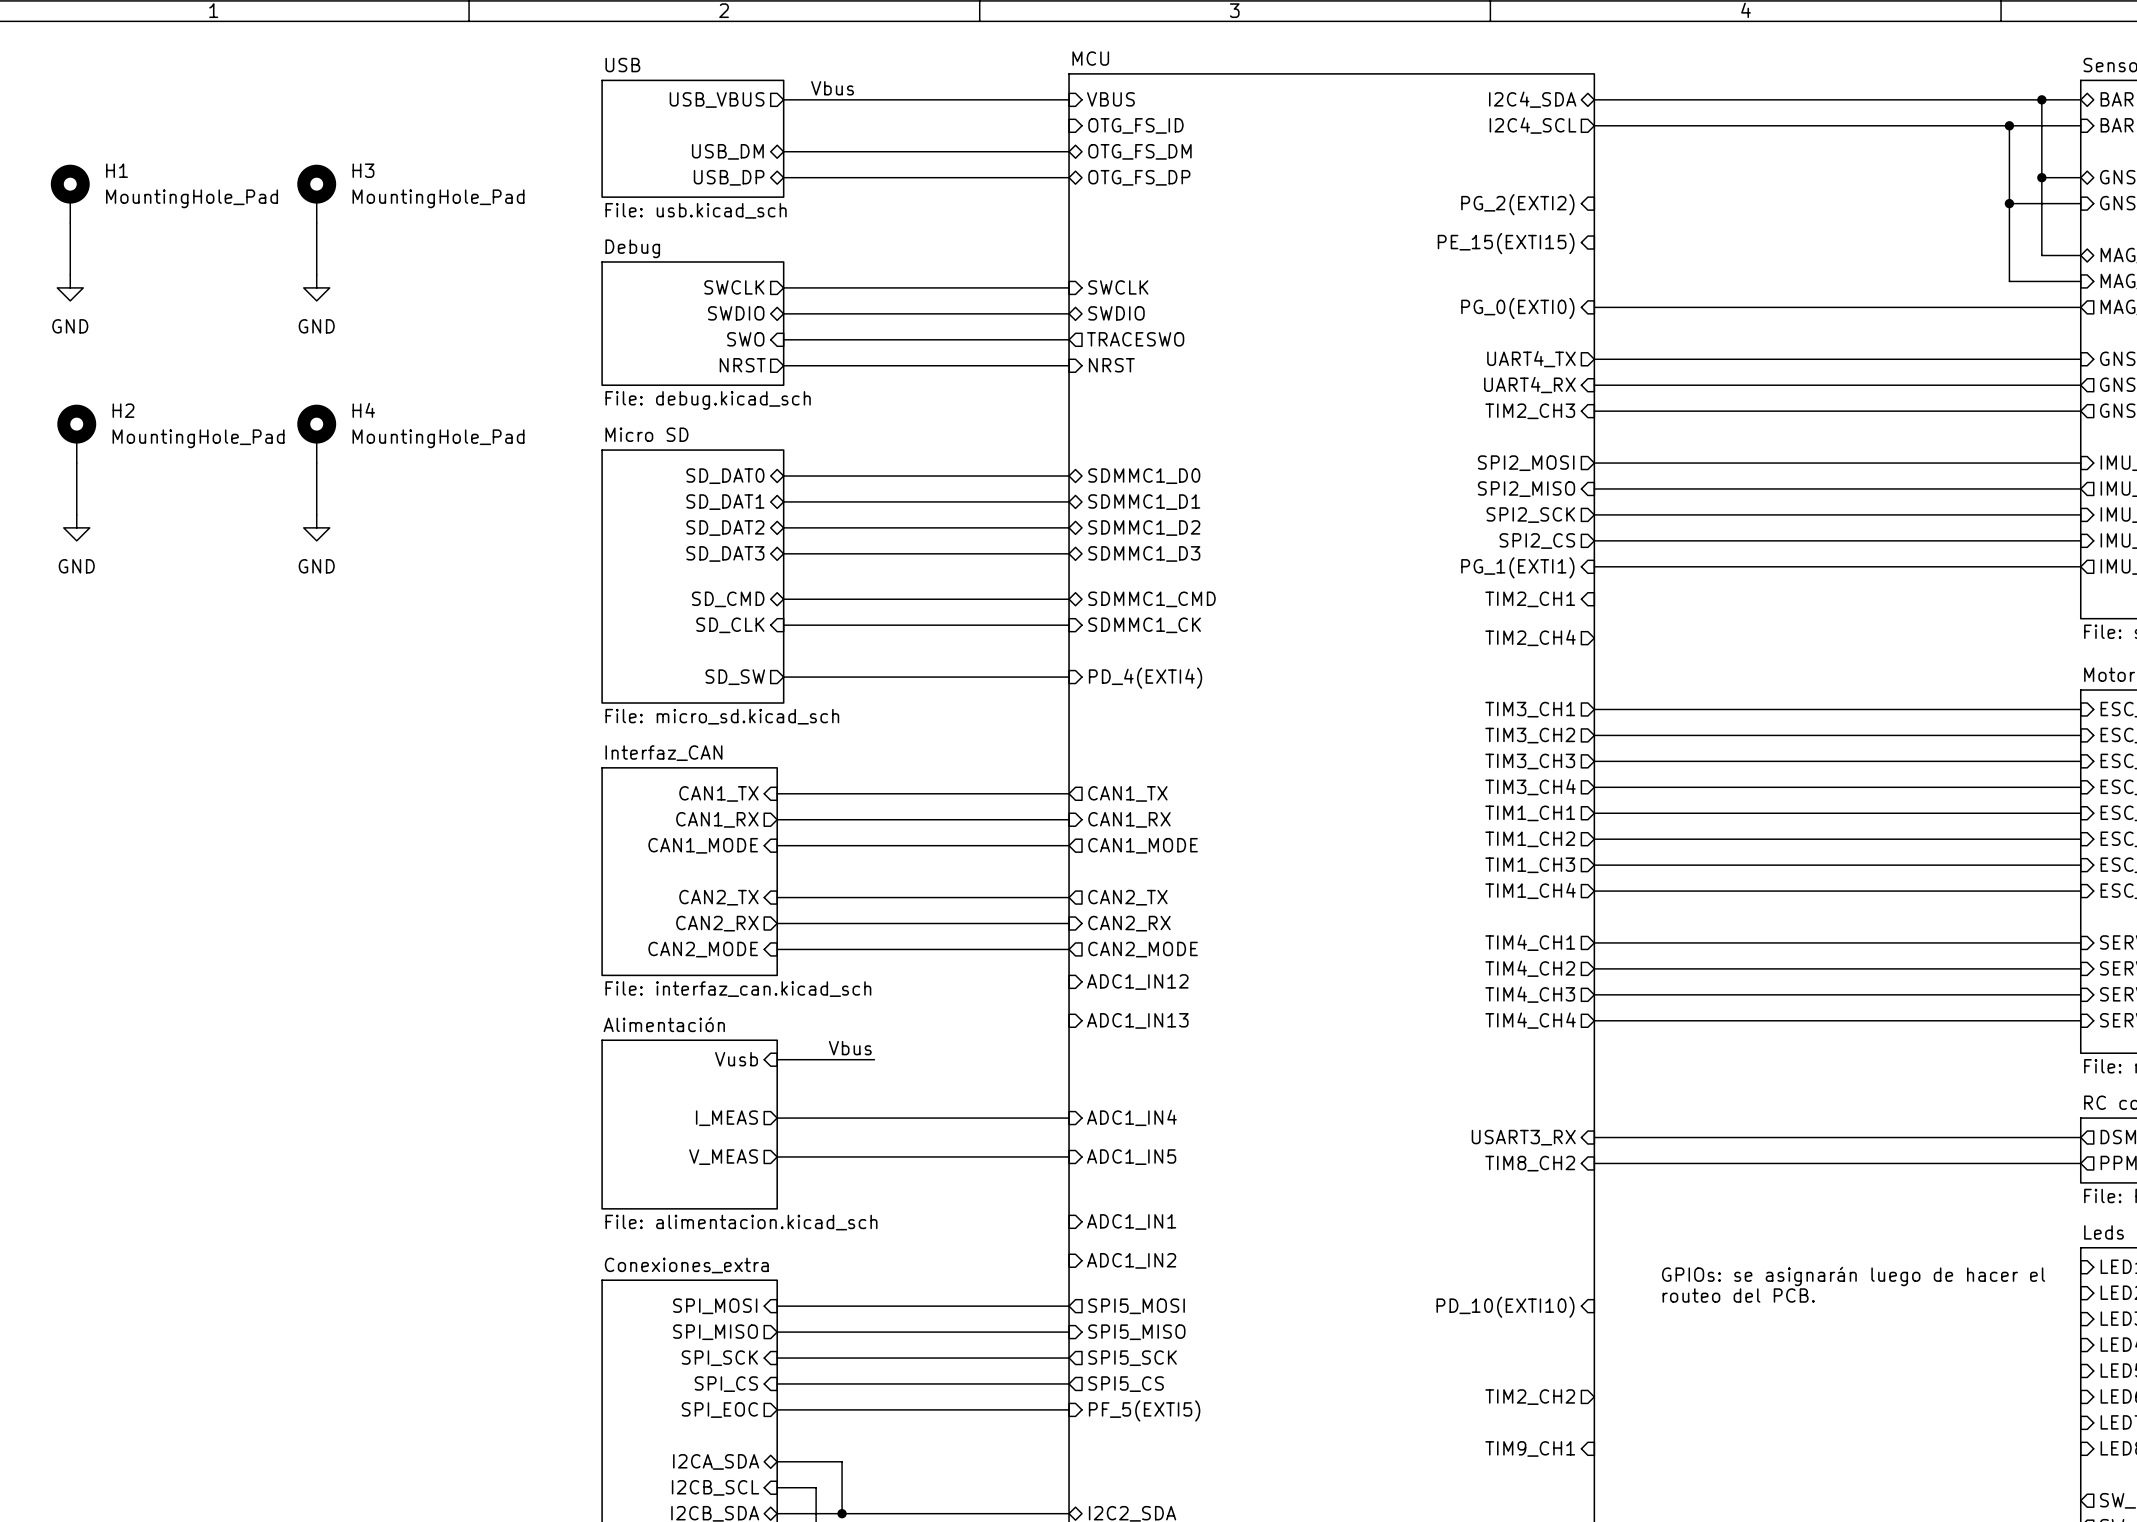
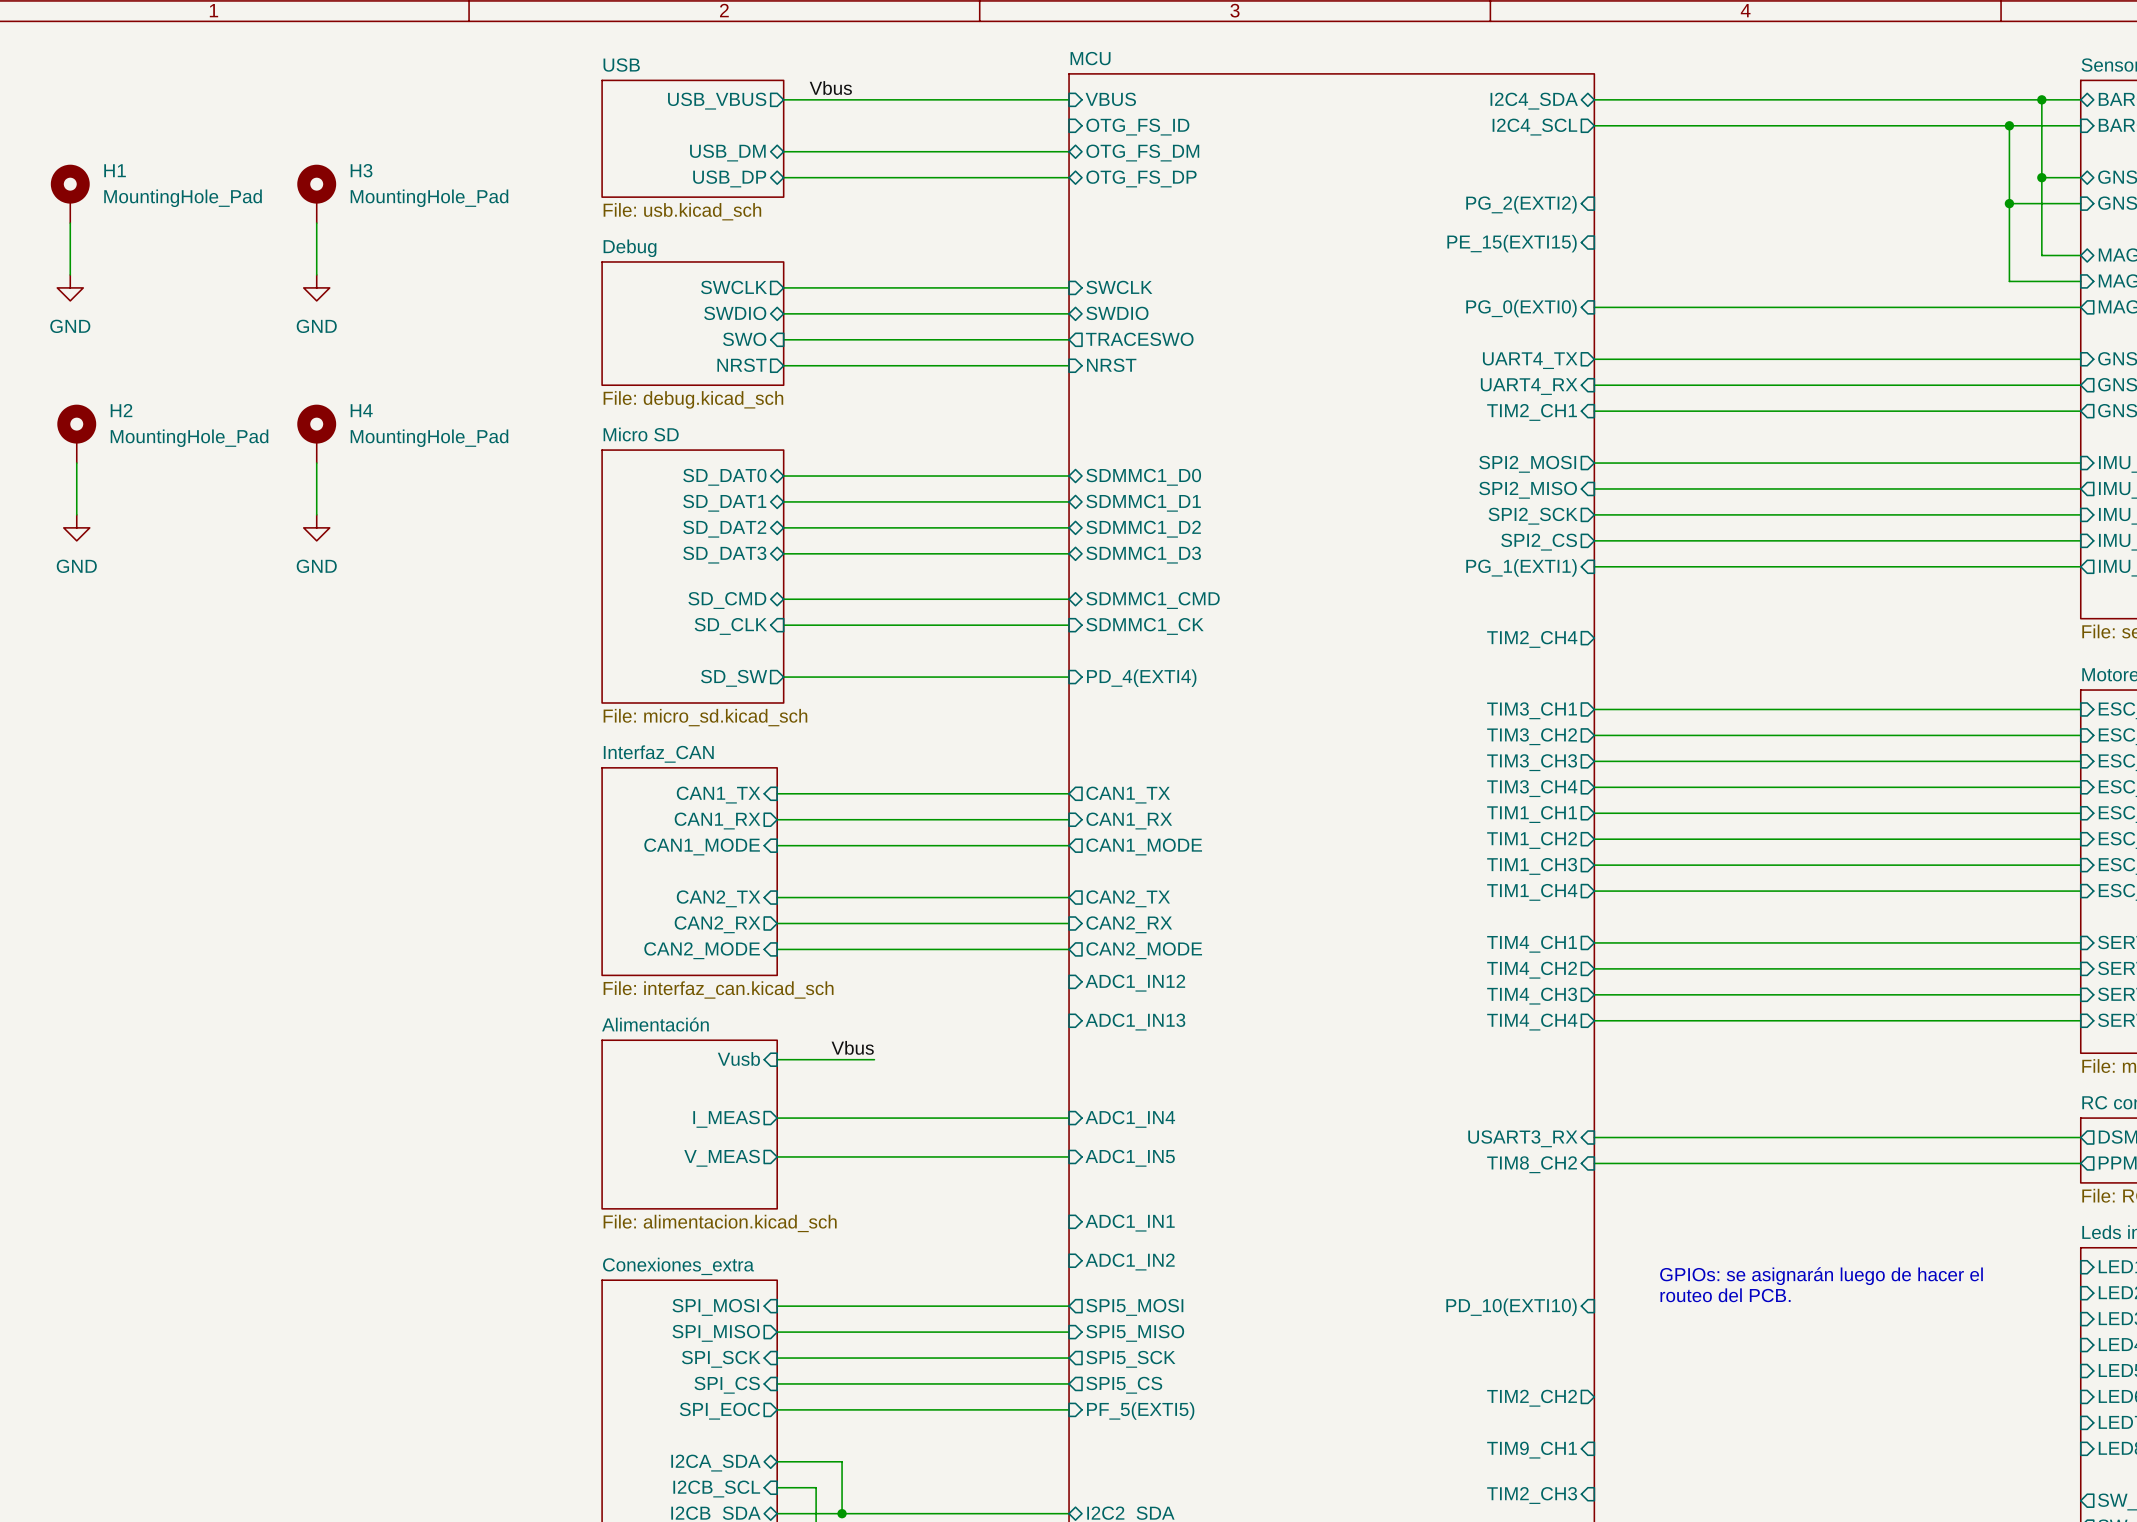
sheet pin: TIM2_CH3 (1530, 411) -> TIM2_CH1 (1532, 412)
sheet pin: TIM2_CH1 (1530, 599) -> none
sheet pin: none -> TIM2_CH3 (1532, 1495)

